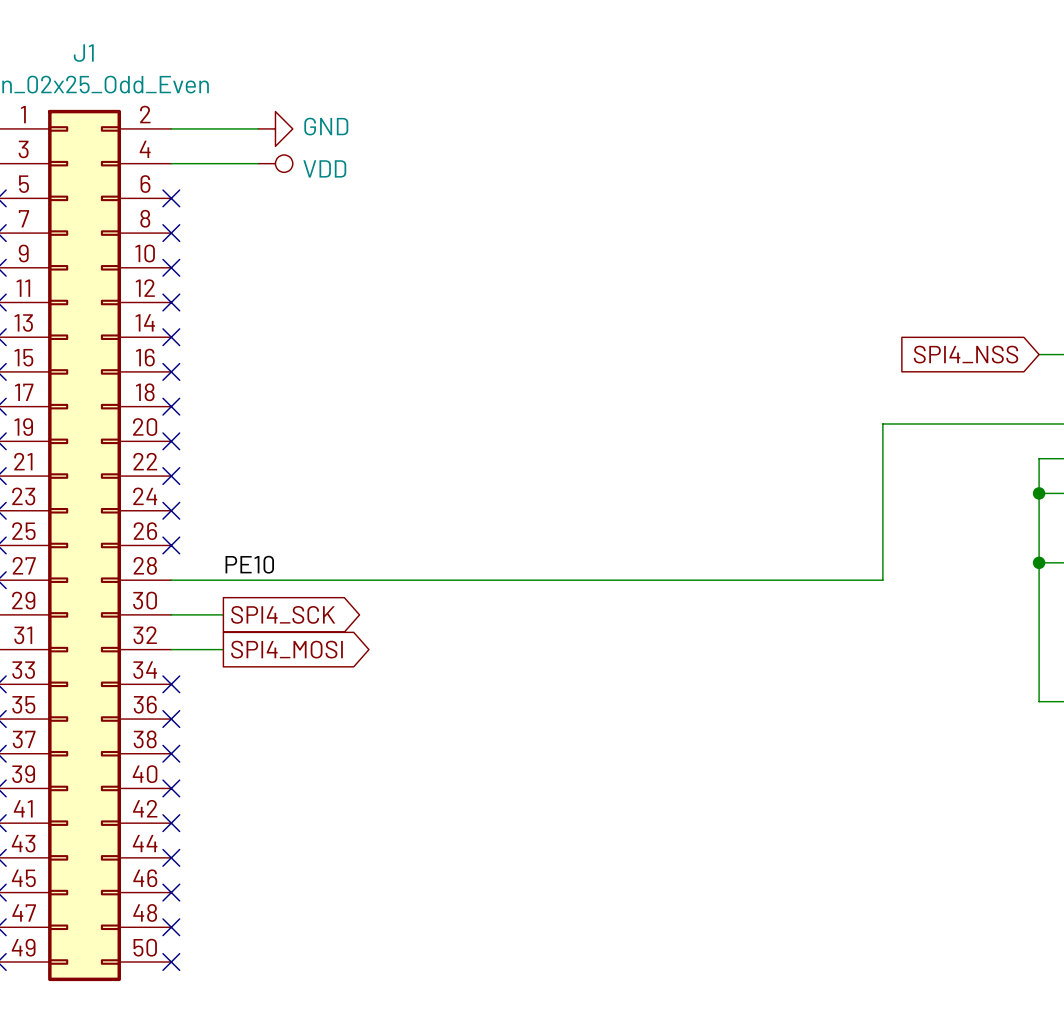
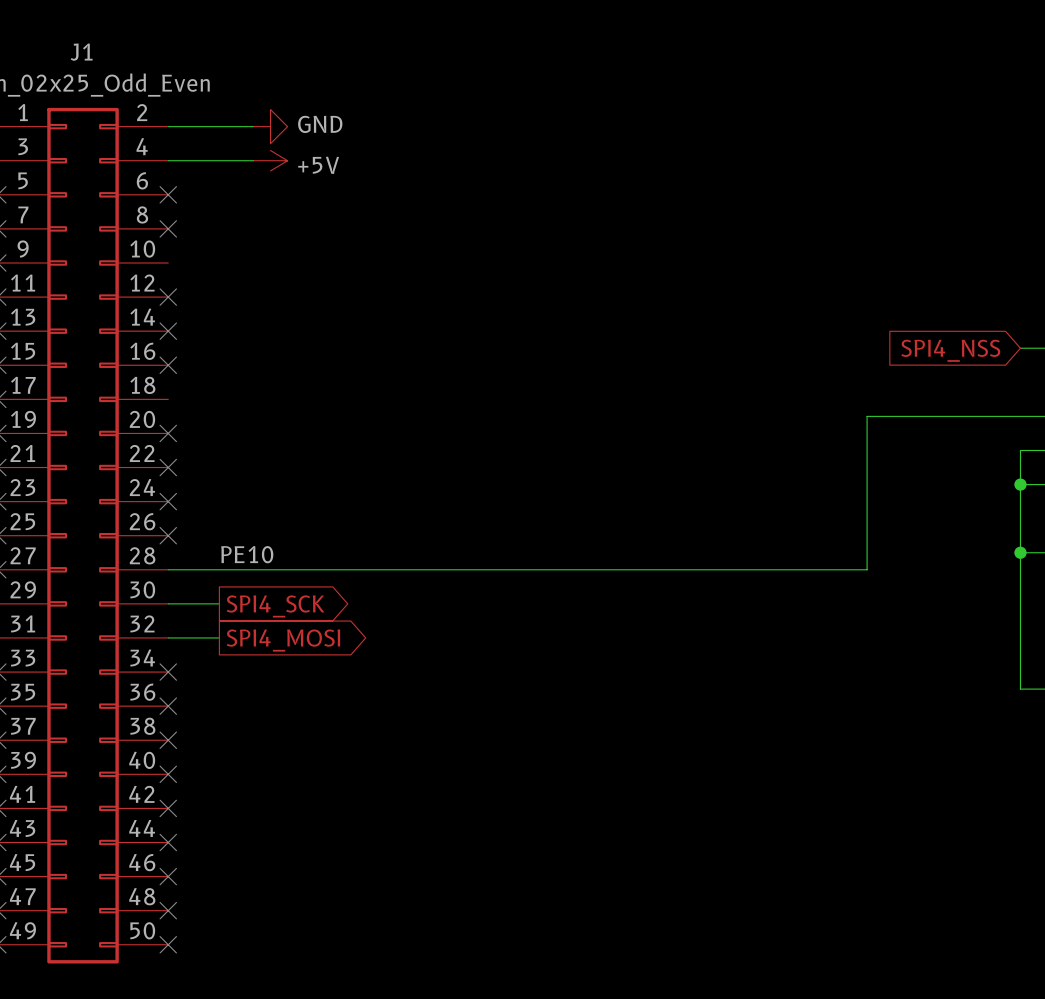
power symbol: VDD (275, 163) -> +5V (270, 160)
no-connect mark: (171, 267) -> none
no-connect mark: (171, 406) -> none

